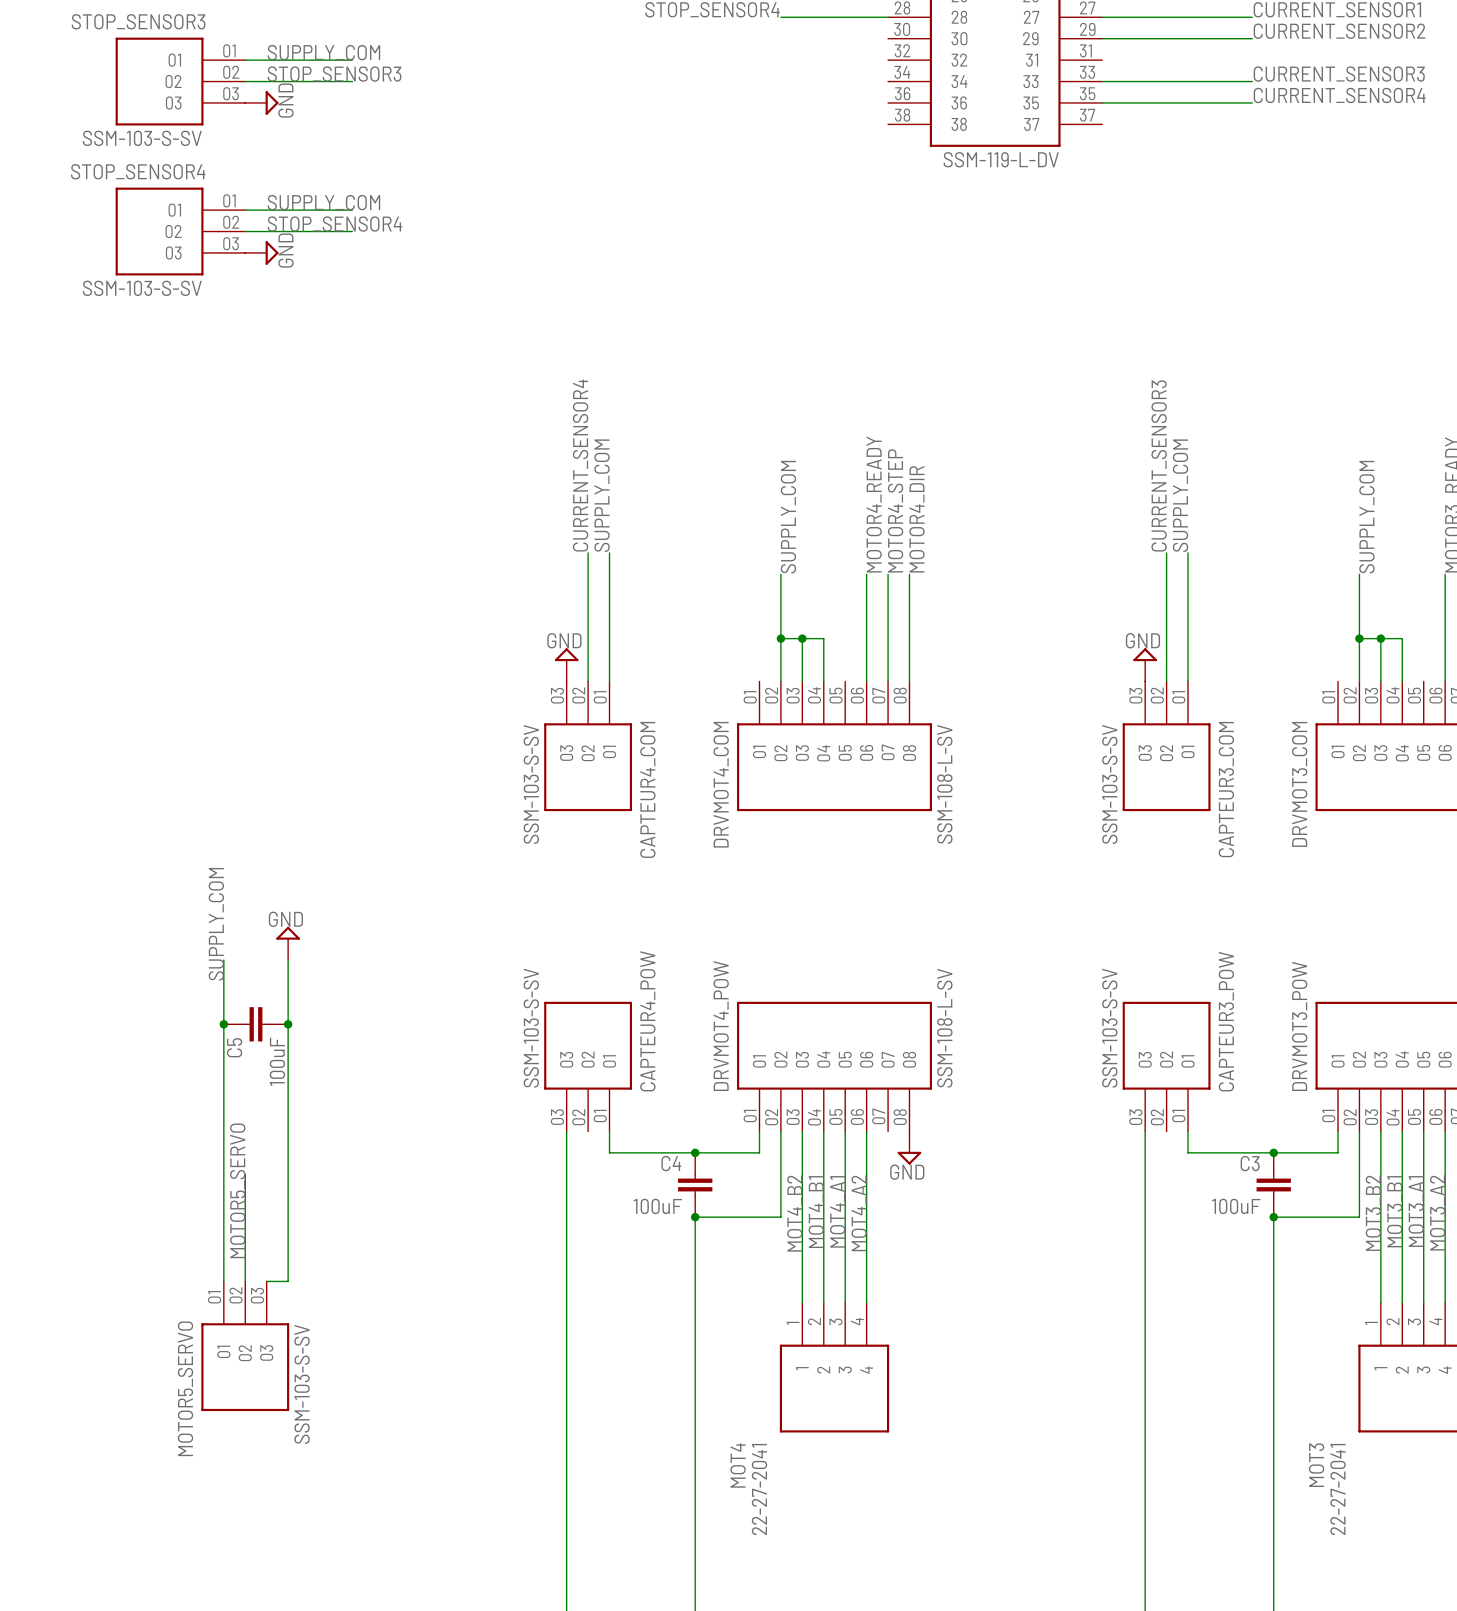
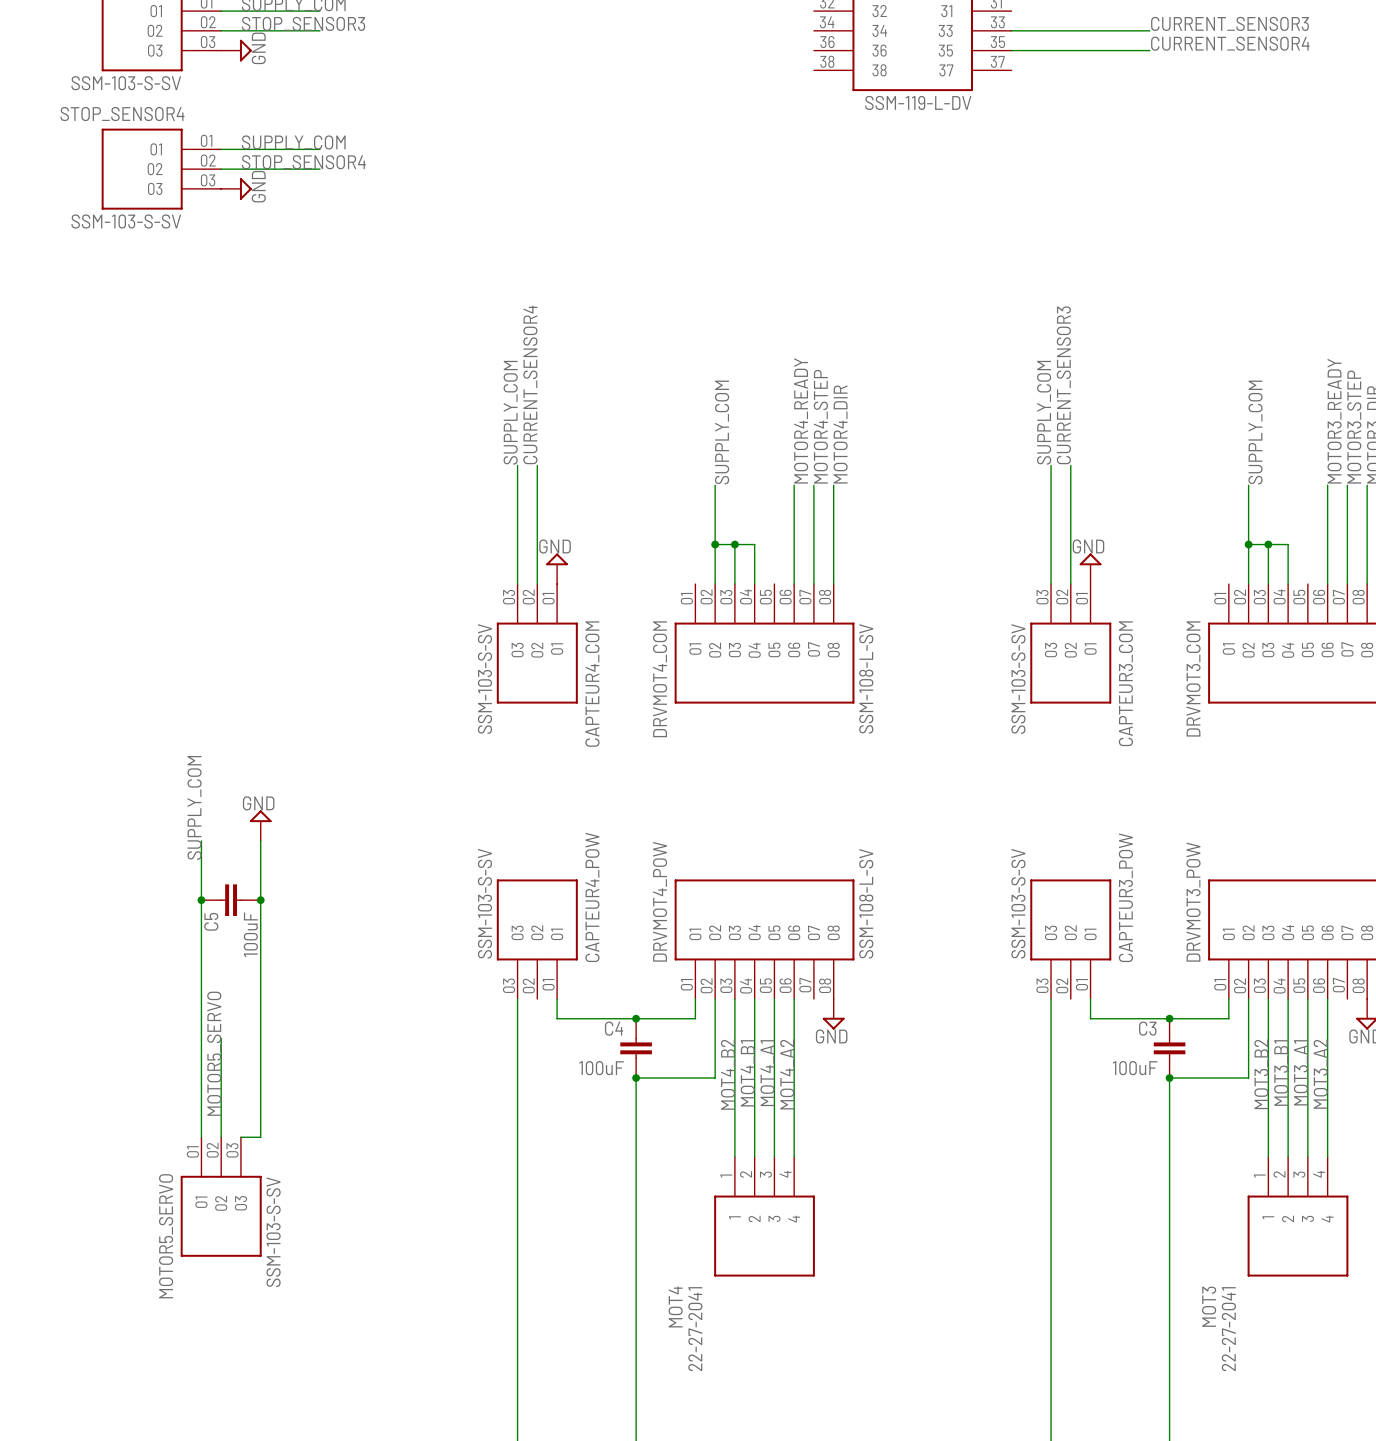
label position: SUPPLY_COM (602, 495) -> SUPPLY_COM (510, 412)
label position: SUPPLY_COM (1180, 495) -> SUPPLY_COM (1044, 412)
wire: (609, 552) (609, 681) -> (517, 465) (517, 584)
wire: (1188, 552) (1188, 681) -> (1051, 465) (1051, 584)
power symbol position: GND (566, 664) -> GND (557, 568)
power symbol position: GND (1145, 664) -> GND (1090, 568)

